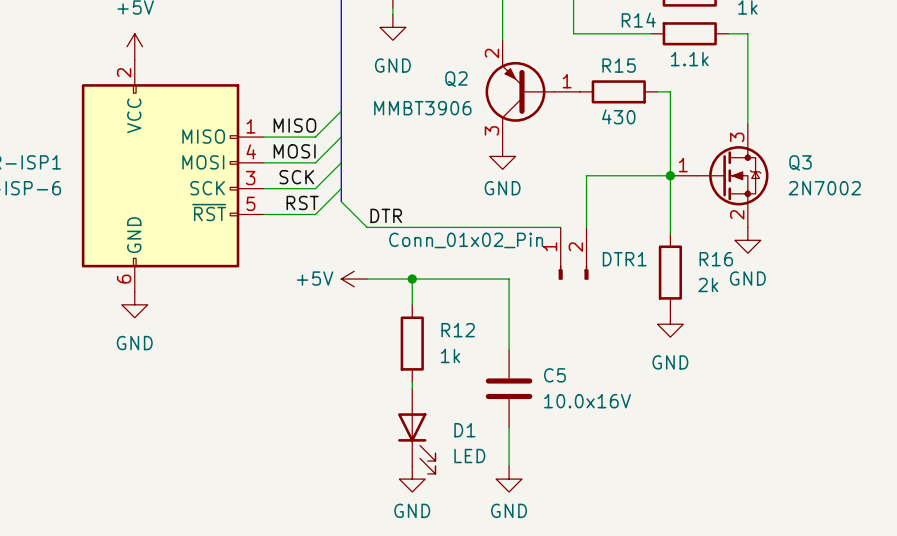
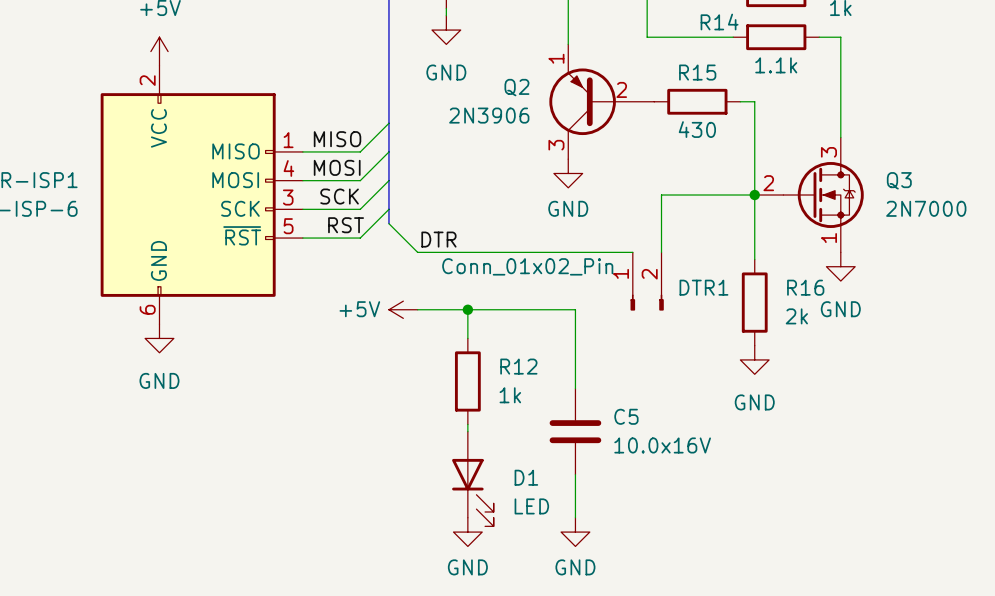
Q2 symbol: [485, 40, 581, 144] -> [549, 44, 655, 160]
Q2 value: MMBT3906 (422, 108) -> 2N3906 (489, 115)
Q3 pin number: 1 (683, 165) -> 2 (768, 183)
Q3 value: 2N7002 (824, 188) -> 2N7000 (926, 208)
Q3 pin number: 2 (737, 214) -> 1 (828, 238)

